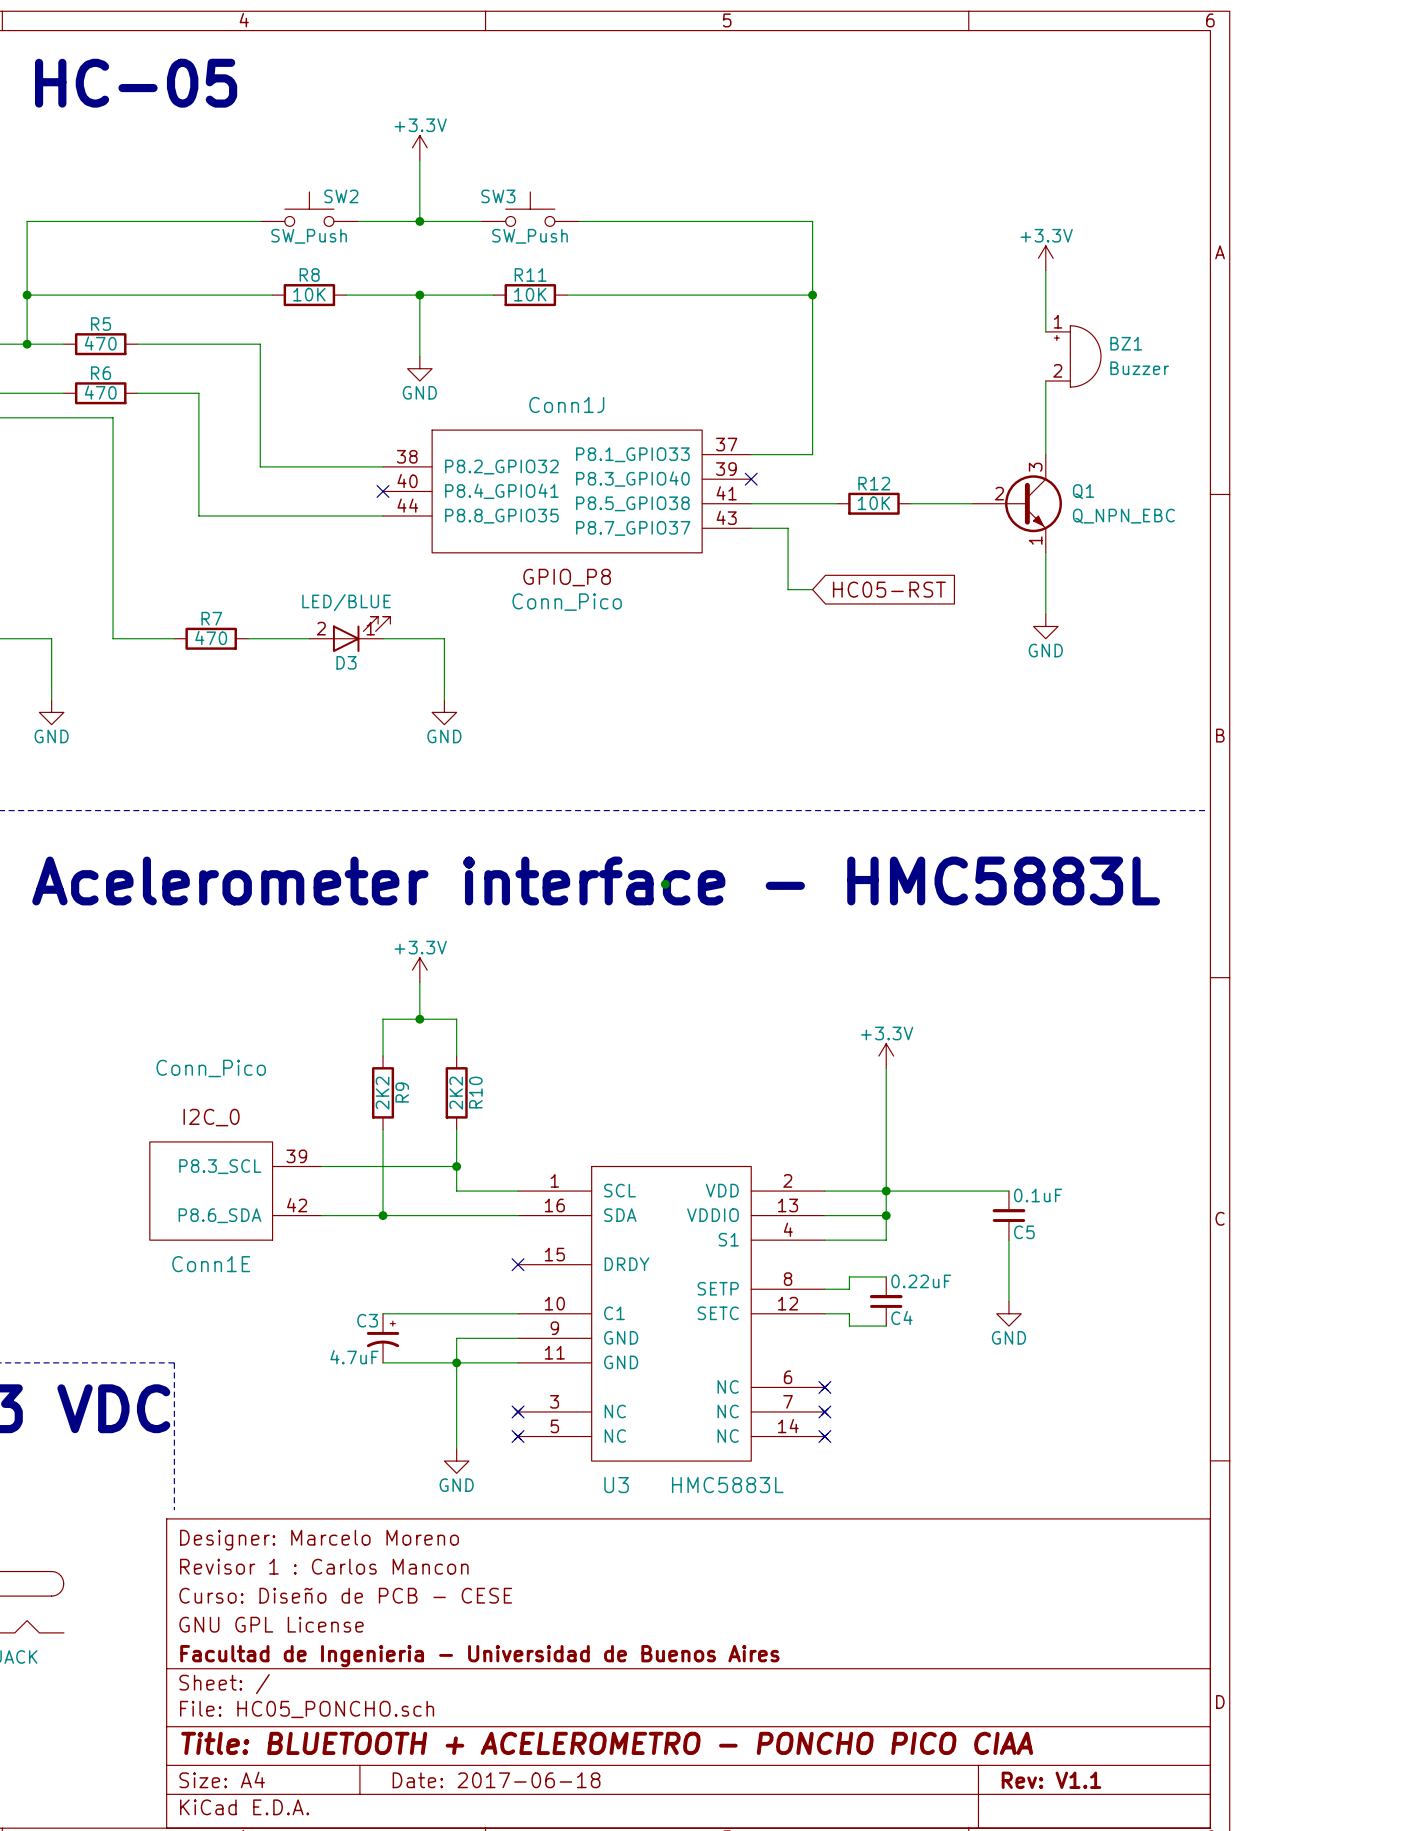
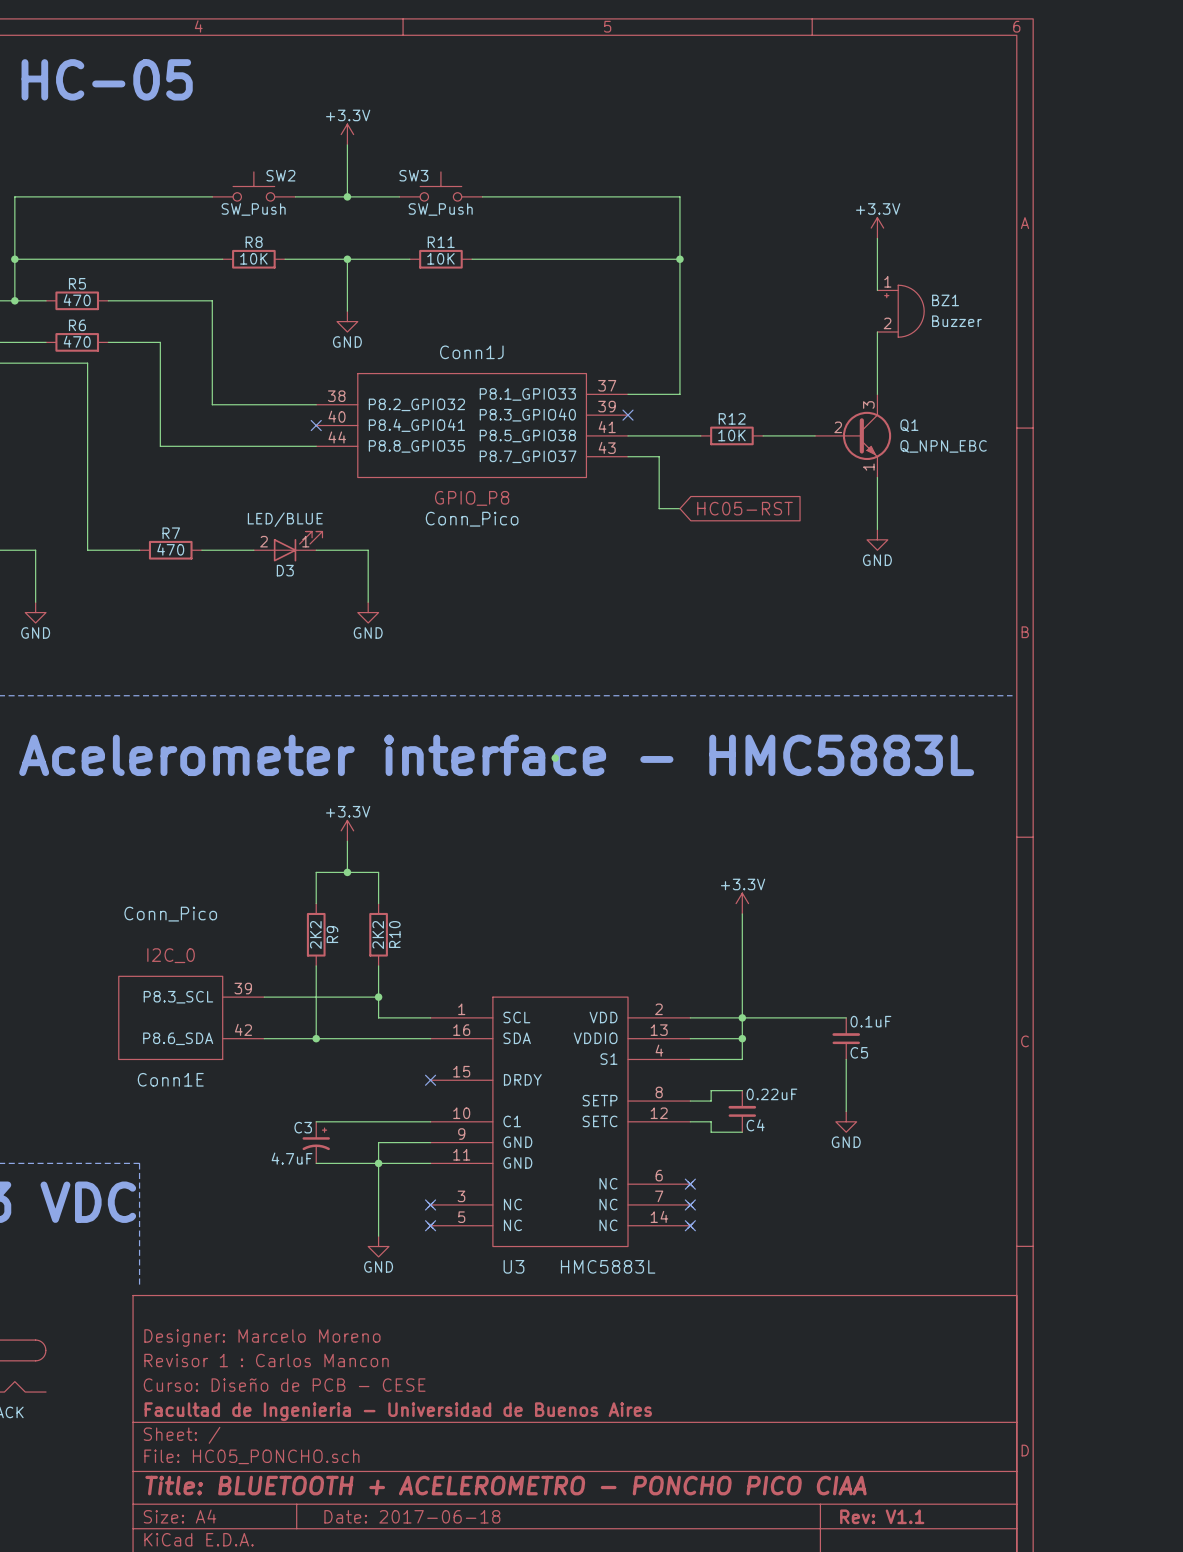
title block: Designer: Marcelo Moreno (319, 1540) -> none
title block: Revisor 1 : Carlos Mancon (324, 1566) -> Designer: Marcelo Moreno (262, 1338)
title block: Curso: Diseño de PCB - CESE (345, 1595) -> Revisor 1 : Carlos Mancon (266, 1360)
title block: GNU GPL License (271, 1624) -> Curso: Diseño de PCB - CESE (284, 1385)

